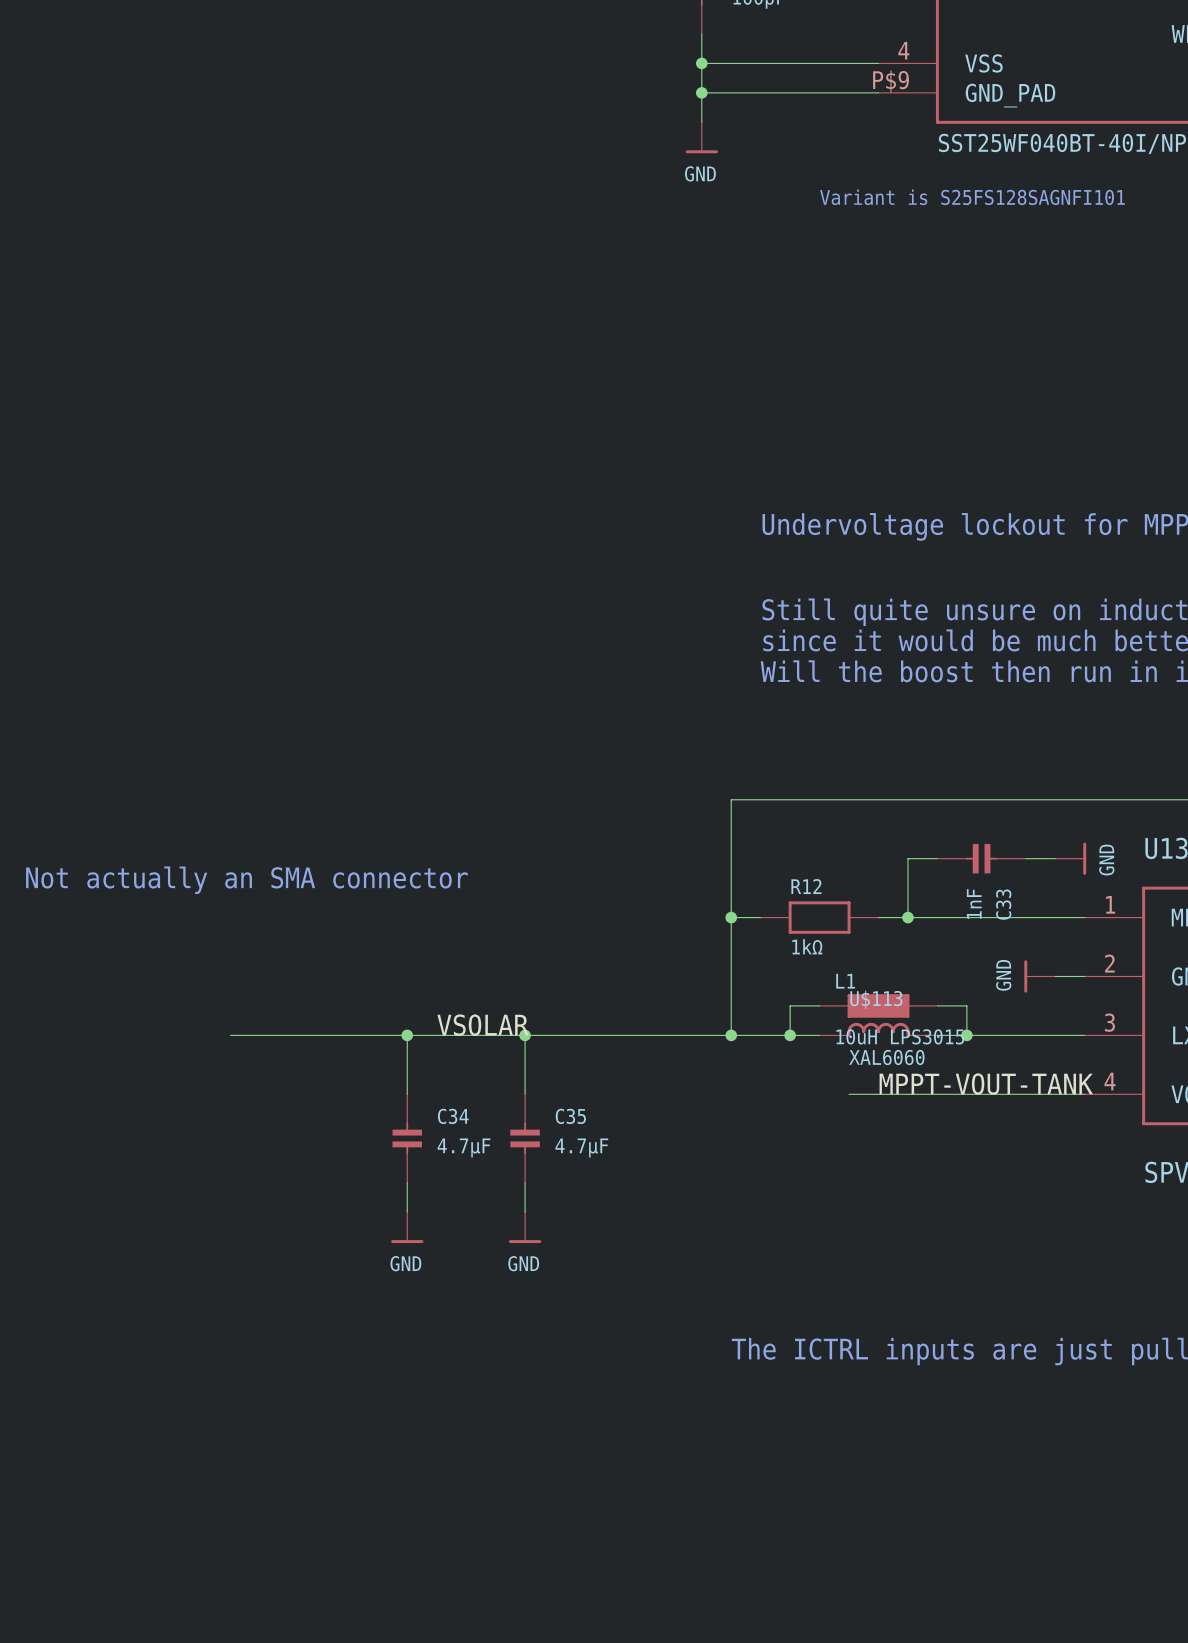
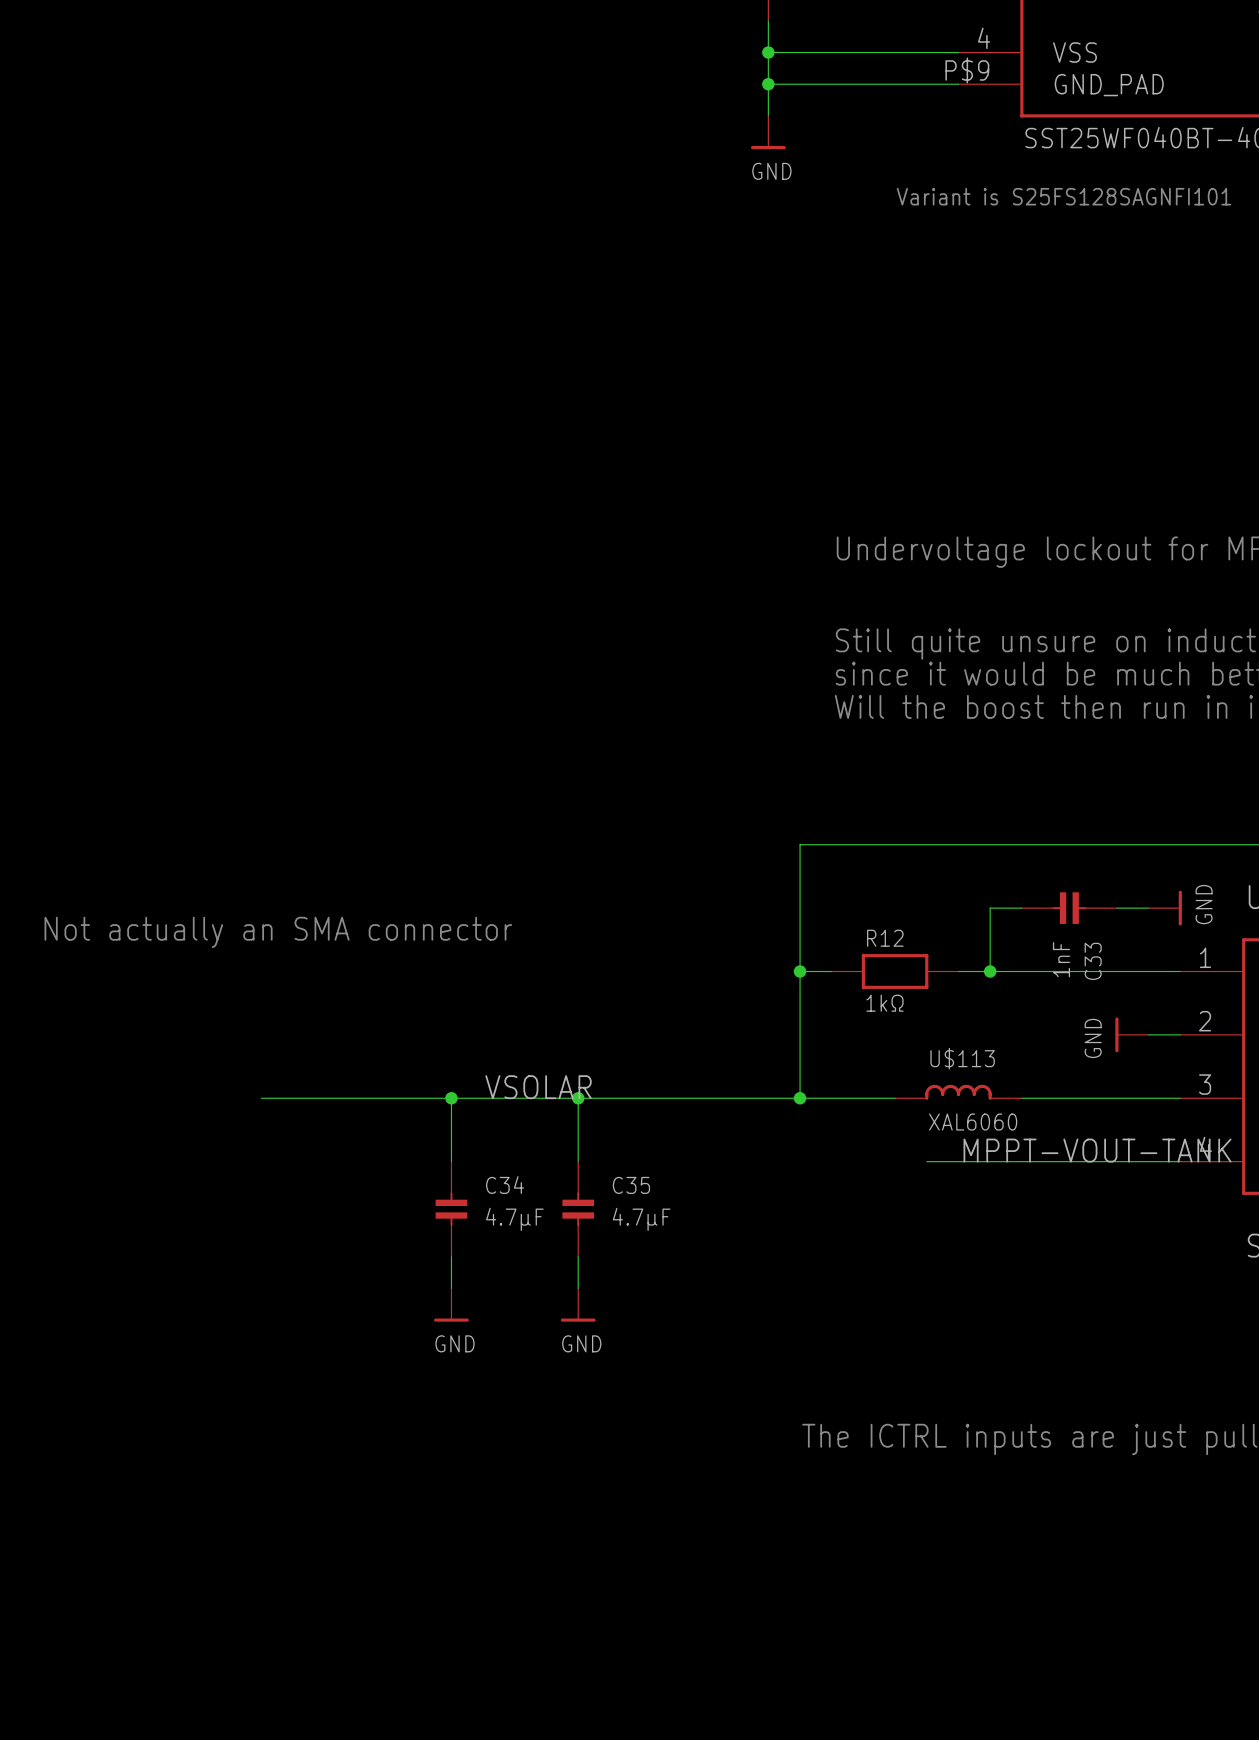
wire: (819, 1005) (790, 1005) (790, 1035) -> none
L1: 10uH LPS3015 (878, 1005) -> none
wire: (937, 1005) (966, 1005) (966, 1035) -> none
junction: (790, 1035) -> none
junction: (966, 1035) -> none

